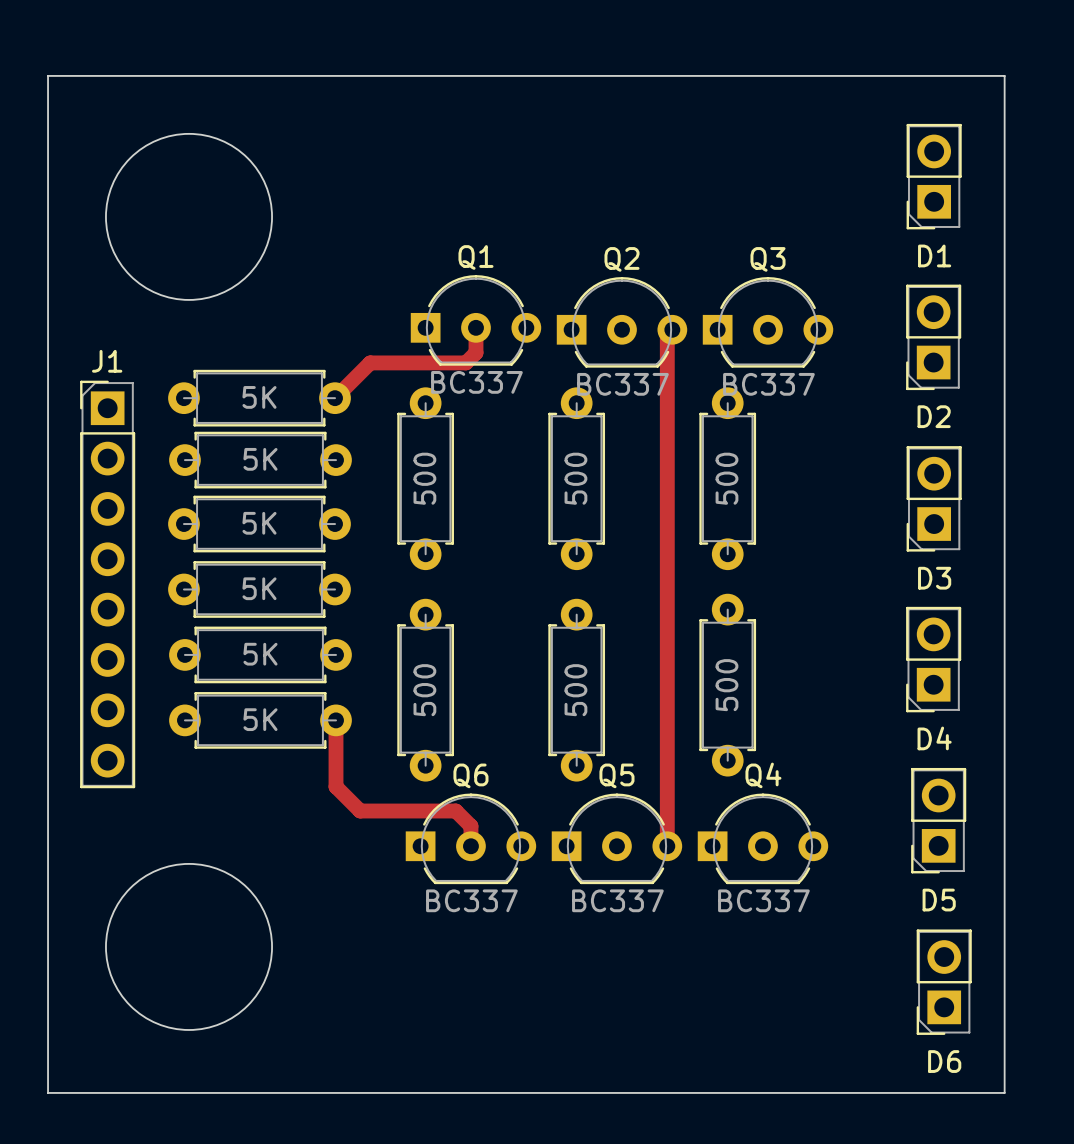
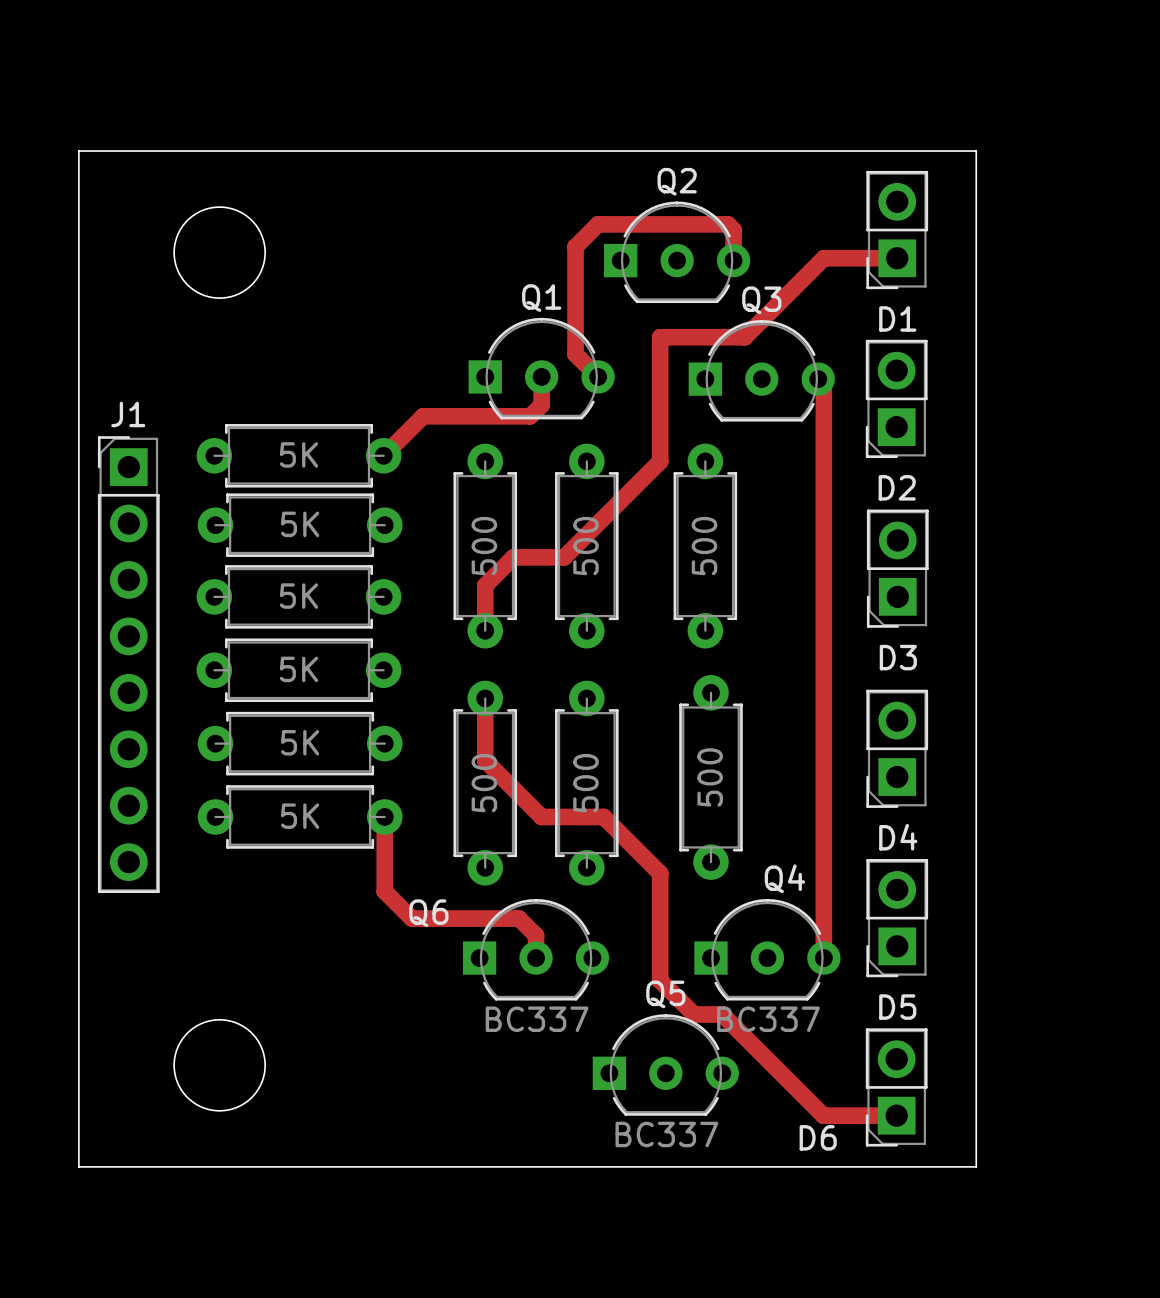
board edge: (48, 75) (1004, 75) (1004, 1092) (48, 1092) (48, 75) -> (78, 151) (78, 1166) (976, 1166) (976, 151) (78, 151)
round board edge size: [105, 133, 273, 301] -> [173, 206, 266, 299]
D1 position: (934, 176) -> (897, 230)
track: none -> (897, 258) (823, 258) (744, 337) (660, 337) (660, 461) (564, 557) (513, 557) (485, 585) (485, 630)
track: none -> (733, 260) (733, 230) (727, 224) (598, 224) (575, 246) (575, 354) (598, 376)
Q2 position: (622, 322) -> (677, 252)
Q3 position: (768, 322) -> (761, 370)
track: (672, 329) (667, 334) (667, 846) -> none
track: none -> (818, 379) (823, 384) (823, 958)
D2 position: (933, 337) -> (896, 398)
Q1 value: BC337 (476, 382) -> none
Q2 value: BC337 (622, 384) -> none
Q3 value: BC337 (768, 384) -> none
part: none -> 500 (586, 546)
part: 500 (576, 478) -> none
part: none -> 500 (705, 546)
part: 500 (727, 478) -> none
D3 position: (934, 498) -> (897, 568)
track: none -> (485, 698) (485, 760) (541, 816) (603, 816) (660, 873) (660, 980) (694, 1014) (722, 1014) (823, 1115) (896, 1115)
D4 position: (933, 659) -> (897, 748)
part: none -> 500 (710, 777)
part: 500 (727, 685) -> none
part: none -> 500 (586, 783)
part: 500 (576, 690) -> none
Q6 name position: Q6 (470, 775) -> Q6 (428, 913)
Q4 name position: Q4 (763, 775) -> Q4 (784, 878)
D5 position: (938, 820) -> (897, 918)
Q5 position: (616, 838) -> (665, 1064)
Q4 position: (762, 838) -> (767, 949)
round board edge size: [105, 863, 273, 1031] -> [173, 1019, 266, 1112]
D6 position: (944, 982) -> (896, 1087)
D6 name position: D6 (944, 1061) -> D6 (818, 1137)

